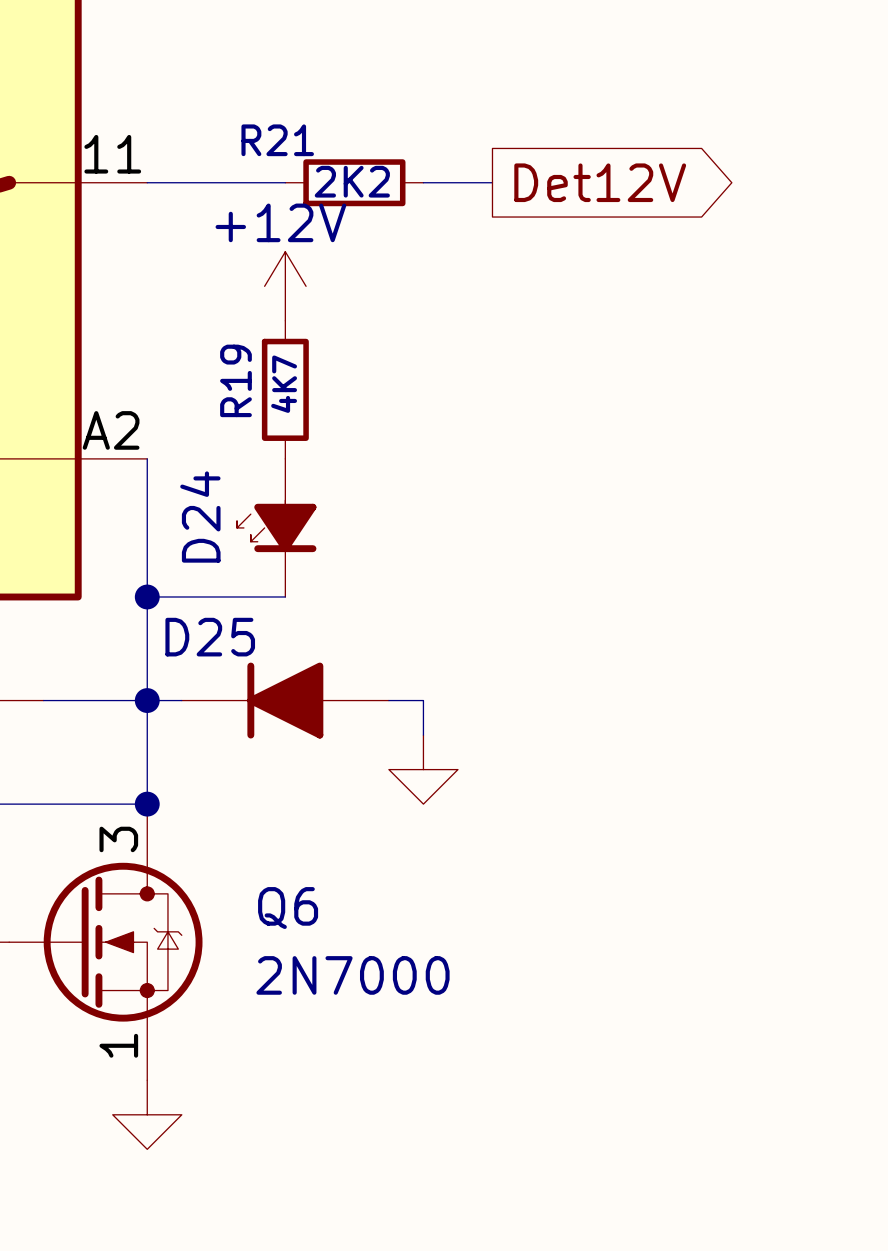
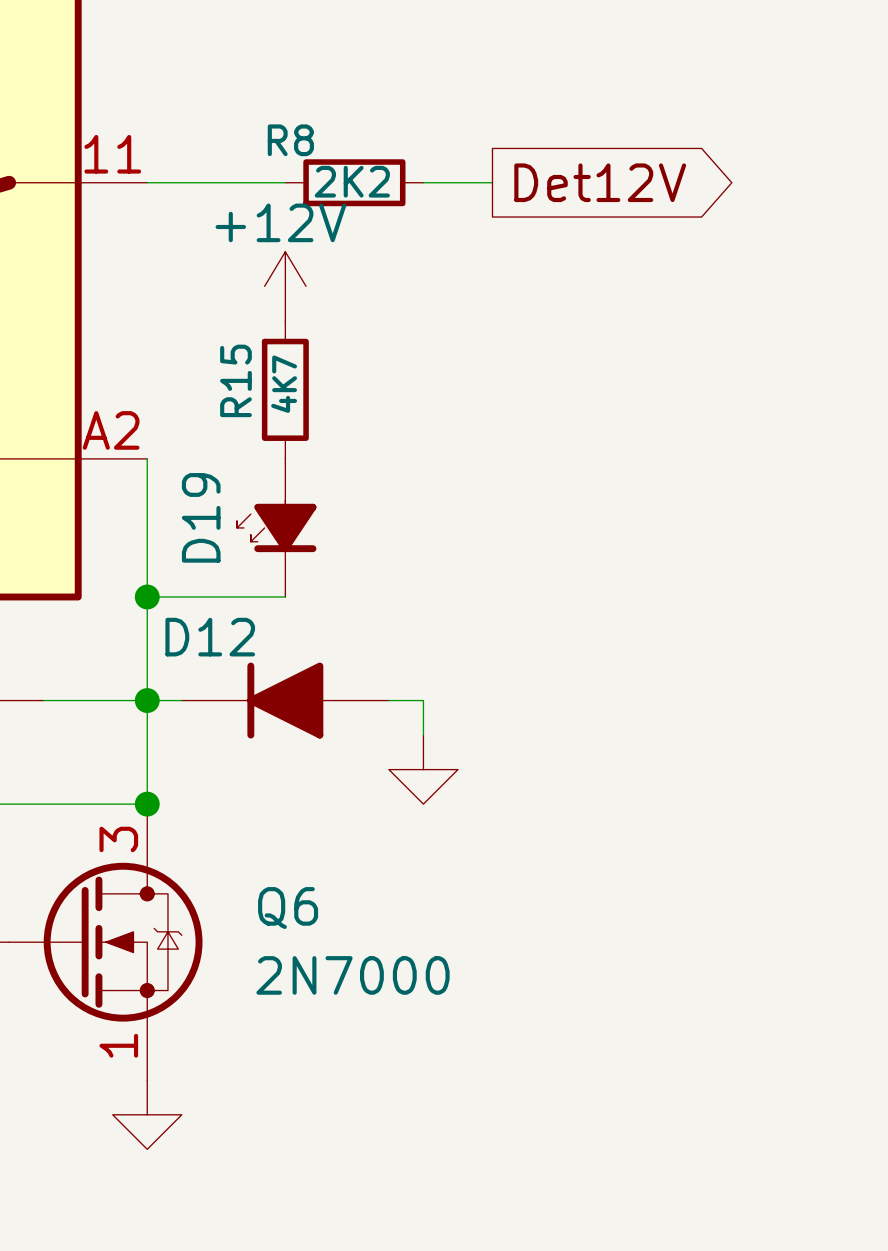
R21 name: R21 (277, 140) -> R8 (290, 140)
R19 name: R19 (235, 380) -> R15 (235, 380)
D24 name: D24 (200, 517) -> D19 (201, 517)
D25 name: D25 (210, 637) -> D12 (210, 637)

